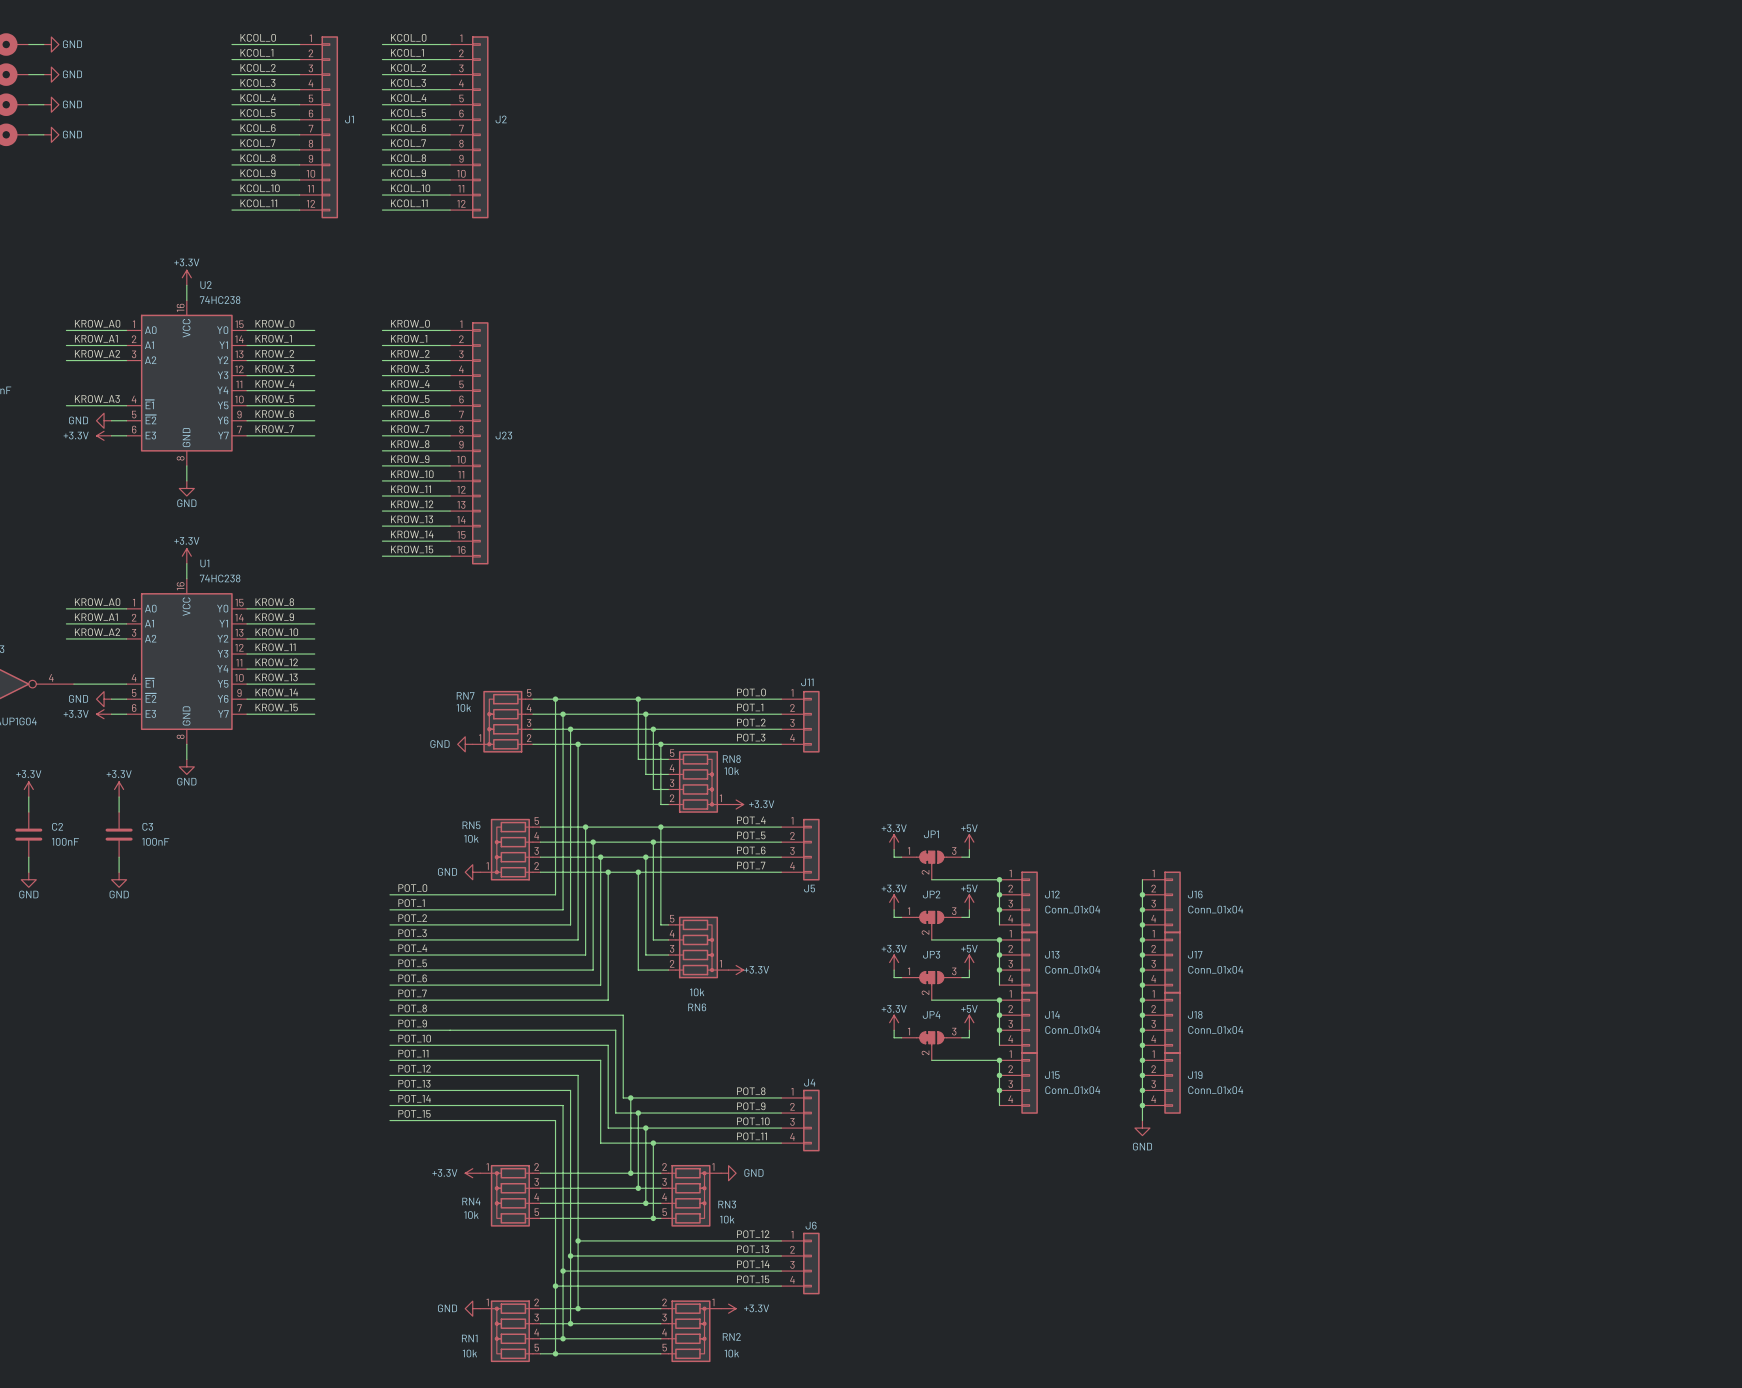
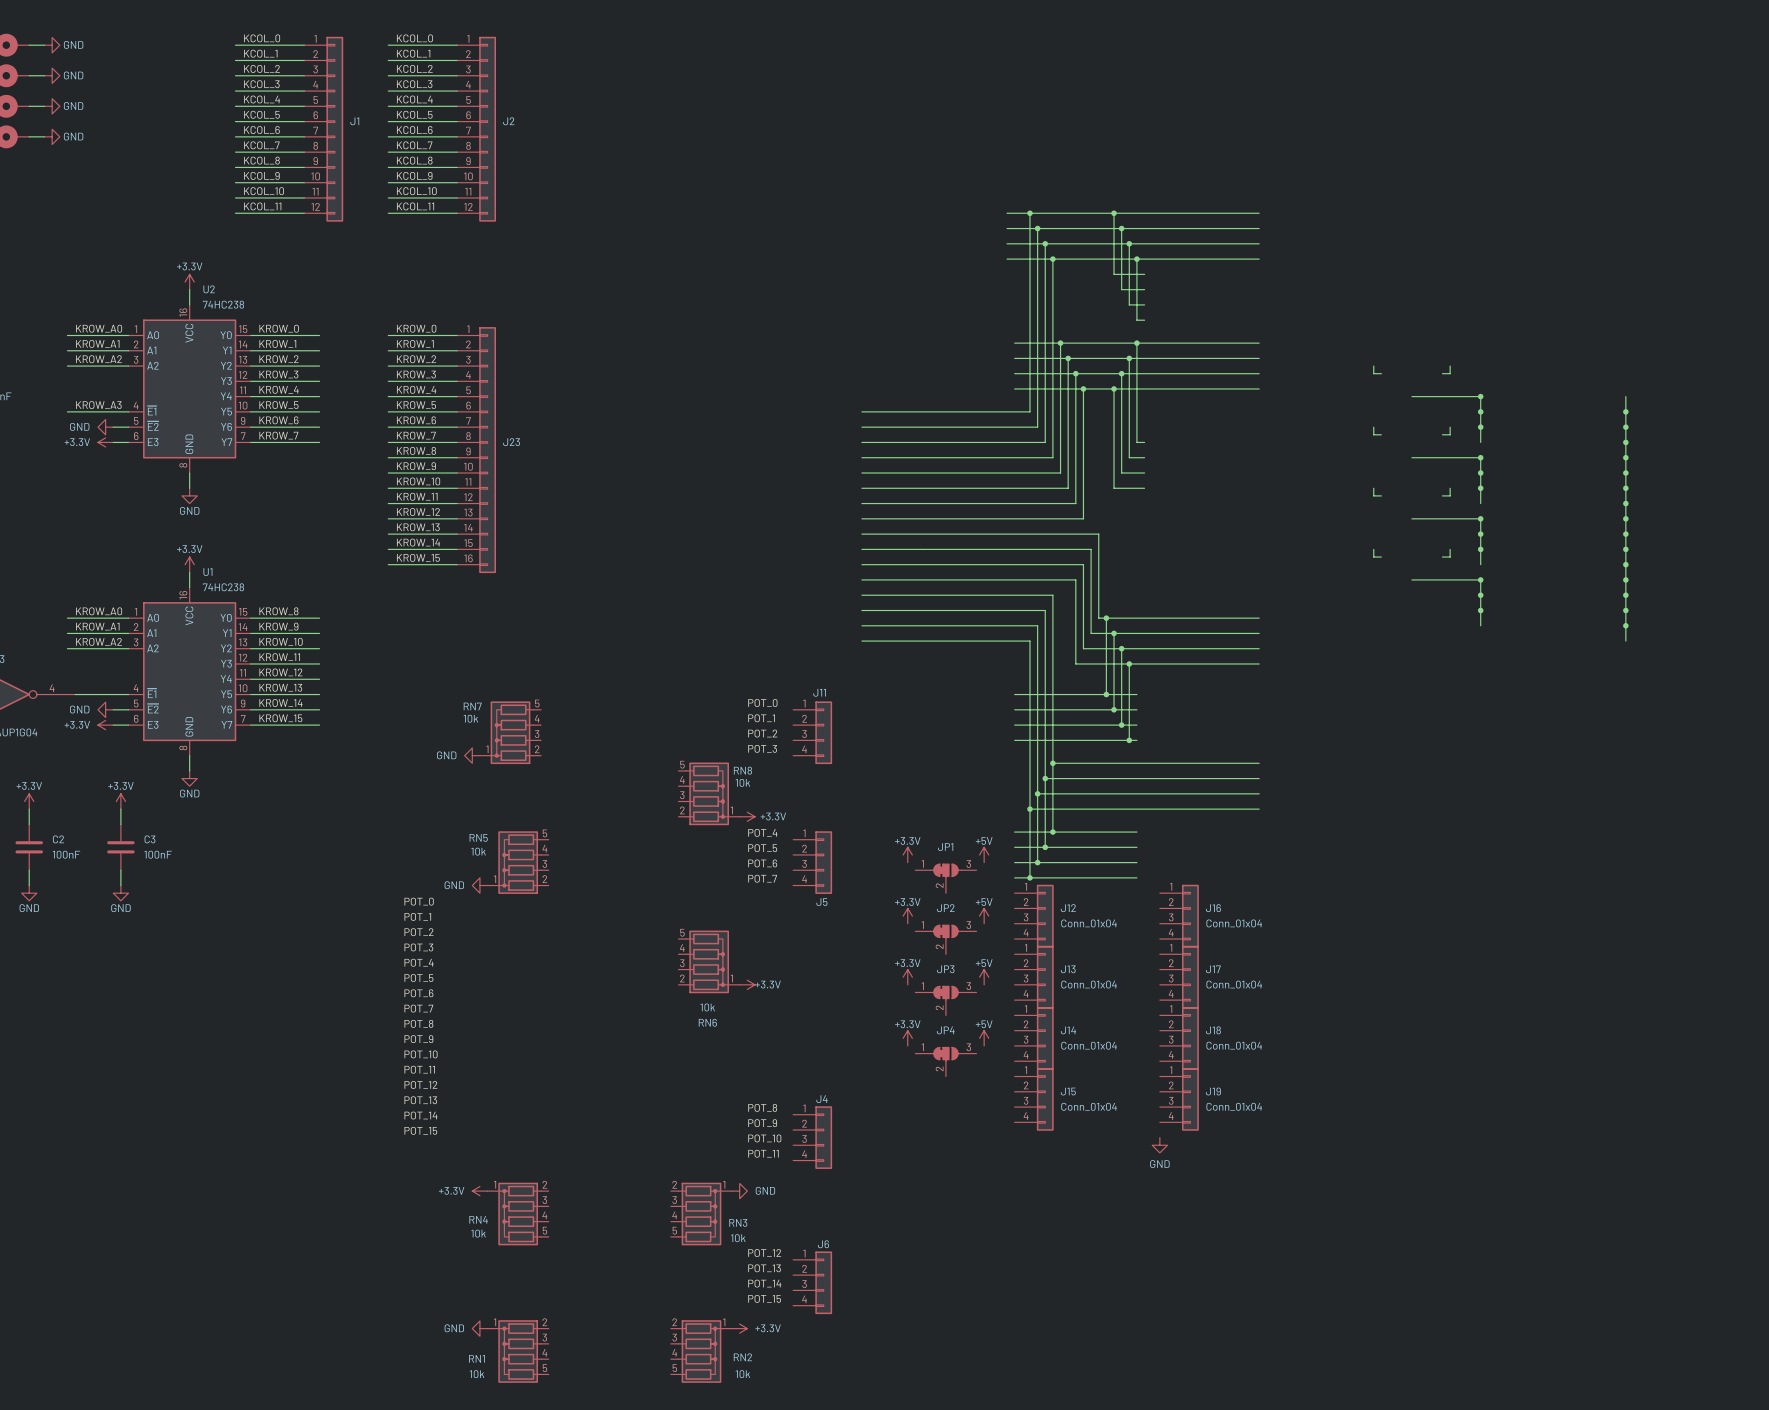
wire: none -> (1007, 213) (1259, 213)
wire: none -> (1029, 213) (1029, 411) (861, 411)
junction: none -> (1029, 213)
wire: none -> (1114, 213) (1114, 274) (1144, 274)
junction: none -> (1114, 213)
wire: none -> (1007, 228) (1259, 228)
wire: none -> (1037, 228) (1037, 427) (861, 427)
junction: none -> (1037, 228)
wire: none -> (1121, 228) (1121, 289) (1144, 289)
junction: none -> (1121, 228)
wire: none -> (1007, 243) (1259, 243)
wire: none -> (1045, 243) (1045, 442) (861, 442)
junction: none -> (1045, 243)
wire: none -> (1129, 243) (1129, 304) (1144, 304)
junction: none -> (1129, 243)
wire: none -> (1007, 259) (1259, 259)
wire: none -> (1052, 259) (1052, 457) (861, 457)
junction: none -> (1052, 259)
wire: none -> (1136, 259) (1136, 320) (1144, 320)
junction: none -> (1136, 259)
wire: none -> (1014, 343) (1259, 343)
wire: none -> (1060, 343) (1060, 473) (861, 473)
junction: none -> (1060, 343)
wire: none -> (1136, 343) (1136, 442) (1144, 442)
junction: none -> (1136, 343)
wire: none -> (1014, 358) (1259, 358)
wire: none -> (1068, 358) (1068, 488) (861, 488)
junction: none -> (1068, 358)
wire: none -> (1129, 358) (1129, 457) (1144, 457)
junction: none -> (1129, 358)
wire: none -> (1373, 366) (1373, 373) (1381, 373)
wire: none -> (1450, 366) (1450, 373) (1442, 373)
wire: none -> (1014, 373) (1259, 373)
wire: none -> (1075, 373) (1075, 503) (861, 503)
junction: none -> (1075, 373)
wire: none -> (1121, 373) (1121, 473) (1144, 473)
junction: none -> (1121, 373)
wire: none -> (1014, 388) (1259, 388)
wire: none -> (1083, 388) (1083, 518) (861, 518)
junction: none -> (1083, 388)
wire: none -> (1114, 388) (1114, 488) (1144, 488)
junction: none -> (1114, 388)
wire: none -> (1411, 396) (1480, 396) (1480, 442)
junction: none -> (1480, 396)
wire: none -> (1625, 396) (1625, 641)
junction: none -> (1480, 411)
junction: none -> (1625, 411)
wire: none -> (1373, 427) (1373, 434) (1381, 434)
wire: none -> (1450, 427) (1450, 434) (1442, 434)
junction: none -> (1480, 427)
junction: none -> (1625, 427)
junction: none -> (1625, 442)
wire: none -> (1411, 457) (1480, 457) (1480, 503)
junction: none -> (1480, 457)
junction: none -> (1625, 457)
junction: none -> (1480, 473)
junction: none -> (1625, 473)
wire: none -> (1373, 488) (1373, 495) (1381, 495)
wire: none -> (1450, 488) (1450, 495) (1442, 495)
junction: none -> (1480, 488)
junction: none -> (1625, 488)
junction: none -> (1625, 503)
wire: none -> (1411, 518) (1480, 518) (1480, 564)
junction: none -> (1480, 518)
junction: none -> (1625, 518)
wire: none -> (861, 534) (1098, 534) (1098, 618) (1259, 618)
junction: none -> (1480, 534)
junction: none -> (1625, 534)
wire: none -> (861, 549) (1091, 549) (1091, 633) (1259, 633)
wire: none -> (1373, 549) (1373, 557) (1381, 557)
wire: none -> (1450, 549) (1450, 557) (1442, 557)
junction: none -> (1480, 549)
junction: none -> (1625, 549)
wire: none -> (861, 564) (1083, 564) (1083, 648) (1259, 648)
junction: none -> (1625, 564)
wire: none -> (861, 579) (1075, 579) (1075, 663) (1259, 663)
wire: none -> (1411, 579) (1480, 579) (1480, 625)
junction: none -> (1480, 579)
junction: none -> (1625, 579)
wire: none -> (861, 595) (1052, 595) (1052, 832)
junction: none -> (1480, 595)
junction: none -> (1625, 595)
wire: none -> (861, 610) (1045, 610) (1045, 847)
junction: none -> (1480, 610)
junction: none -> (1625, 610)
wire: none -> (1106, 618) (1106, 694)
junction: none -> (1106, 618)
wire: none -> (861, 625) (1037, 625) (1037, 862)
junction: none -> (1625, 625)
wire: none -> (1114, 633) (1114, 709)
junction: none -> (1114, 633)
wire: none -> (861, 641) (1029, 641) (1029, 877)
wire: none -> (1121, 648) (1121, 725)
junction: none -> (1121, 648)
wire: none -> (1129, 663) (1129, 740)
junction: none -> (1129, 663)
wire: none -> (1014, 694) (1136, 694)
junction: none -> (1106, 694)
wire: (532, 699) (781, 699) -> none
wire: (555, 699) (555, 894) (389, 894) -> none
junction: (555, 699) -> none
wire: (638, 699) (638, 759) (668, 759) -> none
junction: (638, 699) -> none
wire: none -> (1014, 709) (1136, 709)
junction: none -> (1114, 709)
wire: (532, 714) (781, 714) -> none
wire: (563, 714) (563, 909) (389, 909) -> none
junction: (563, 714) -> none
wire: (645, 714) (645, 774) (668, 774) -> none
junction: (645, 714) -> none
wire: none -> (1014, 725) (1136, 725)
junction: none -> (1121, 725)
wire: (532, 729) (781, 729) -> none
wire: (570, 729) (570, 924) (389, 924) -> none
junction: (570, 729) -> none
wire: (653, 729) (653, 789) (668, 789) -> none
junction: (653, 729) -> none
wire: none -> (1014, 740) (1136, 740)
junction: none -> (1129, 740)
wire: (532, 744) (781, 744) -> none
wire: (578, 744) (578, 939) (389, 939) -> none
junction: (578, 744) -> none
wire: (660, 744) (660, 804) (668, 804) -> none
junction: (660, 744) -> none
wire: none -> (1052, 763) (1259, 763)
junction: none -> (1052, 763)
wire: none -> (1045, 778) (1259, 778)
junction: none -> (1045, 778)
wire: none -> (1037, 793) (1259, 793)
junction: none -> (1037, 793)
wire: none -> (1029, 809) (1259, 809)
junction: none -> (1029, 809)
wire: none -> (1014, 832) (1136, 832)
junction: none -> (1052, 832)
wire: (540, 827) (781, 827) -> none
wire: (585, 827) (585, 955) (389, 955) -> none
junction: (585, 827) -> none
wire: (660, 827) (660, 924) (668, 924) -> none
junction: (660, 827) -> none
wire: none -> (1014, 847) (1136, 847)
junction: none -> (1045, 847)
wire: (540, 842) (781, 842) -> none
wire: (593, 842) (593, 970) (389, 970) -> none
junction: (593, 842) -> none
wire: (653, 842) (653, 939) (668, 939) -> none
junction: (653, 842) -> none
wire: (894, 849) (894, 857) (901, 857) -> none
wire: (969, 849) (969, 857) (961, 857) -> none
wire: none -> (1014, 862) (1136, 862)
junction: none -> (1037, 862)
wire: (540, 857) (781, 857) -> none
wire: (600, 857) (600, 985) (389, 985) -> none
junction: (600, 857) -> none
wire: (645, 857) (645, 955) (668, 955) -> none
junction: (645, 857) -> none
wire: none -> (1014, 877) (1136, 877)
junction: none -> (1029, 877)
wire: (540, 872) (781, 872) -> none
wire: (608, 872) (608, 1000) (389, 1000) -> none
junction: (608, 872) -> none
wire: (638, 872) (638, 970) (668, 970) -> none
junction: (638, 872) -> none
wire: (931, 879) (999, 879) (999, 924) -> none
junction: (999, 879) -> none
wire: (1142, 879) (1142, 1120) -> none
junction: (999, 894) -> none
junction: (1142, 894) -> none
wire: (894, 909) (894, 917) (901, 917) -> none
wire: (969, 909) (969, 917) (961, 917) -> none
junction: (999, 909) -> none
junction: (1142, 909) -> none
junction: (1142, 924) -> none
wire: (931, 939) (999, 939) (999, 985) -> none
junction: (999, 939) -> none
junction: (1142, 939) -> none
junction: (999, 955) -> none
junction: (1142, 955) -> none
wire: (894, 970) (894, 977) (901, 977) -> none
wire: (969, 970) (969, 977) (961, 977) -> none
junction: (999, 970) -> none
junction: (1142, 970) -> none
junction: (1142, 985) -> none
wire: (931, 1000) (999, 1000) (999, 1045) -> none
junction: (999, 1000) -> none
junction: (1142, 1000) -> none
wire: (389, 1015) (623, 1015) (623, 1097) (781, 1097) -> none
junction: (999, 1015) -> none
junction: (1142, 1015) -> none
wire: (389, 1030) (615, 1030) (615, 1113) (781, 1113) -> none
wire: (894, 1030) (894, 1037) (901, 1037) -> none
wire: (969, 1030) (969, 1037) (961, 1037) -> none
junction: (999, 1030) -> none
junction: (1142, 1030) -> none
wire: (389, 1045) (608, 1045) (608, 1128) (781, 1128) -> none
junction: (1142, 1045) -> none
wire: (389, 1060) (600, 1060) (600, 1143) (781, 1143) -> none
wire: (931, 1060) (999, 1060) (999, 1105) -> none
junction: (999, 1060) -> none
junction: (1142, 1060) -> none
wire: (389, 1075) (578, 1075) (578, 1308) -> none
junction: (999, 1075) -> none
junction: (1142, 1075) -> none
wire: (389, 1090) (570, 1090) (570, 1323) -> none
junction: (999, 1090) -> none
junction: (1142, 1090) -> none
wire: (630, 1097) (630, 1173) -> none
junction: (630, 1097) -> none
wire: (389, 1105) (563, 1105) (563, 1338) -> none
junction: (1142, 1105) -> none
wire: (638, 1113) (638, 1188) -> none
junction: (638, 1113) -> none
wire: (389, 1120) (555, 1120) (555, 1353) -> none
wire: (645, 1128) (645, 1203) -> none
junction: (645, 1128) -> none
wire: (653, 1143) (653, 1218) -> none
junction: (653, 1143) -> none
wire: (540, 1173) (660, 1173) -> none
junction: (630, 1173) -> none
wire: (540, 1188) (660, 1188) -> none
junction: (638, 1188) -> none
wire: (540, 1203) (660, 1203) -> none
junction: (645, 1203) -> none
wire: (540, 1218) (660, 1218) -> none
junction: (653, 1218) -> none
wire: (578, 1240) (781, 1240) -> none
junction: (578, 1240) -> none
wire: (570, 1255) (781, 1255) -> none
junction: (570, 1255) -> none
wire: (563, 1271) (781, 1271) -> none
junction: (563, 1271) -> none
wire: (555, 1286) (781, 1286) -> none
junction: (555, 1286) -> none
wire: (540, 1308) (660, 1308) -> none
junction: (578, 1308) -> none
wire: (540, 1323) (660, 1323) -> none
junction: (570, 1323) -> none
wire: (540, 1338) (660, 1338) -> none
junction: (563, 1338) -> none
wire: (540, 1353) (660, 1353) -> none
junction: (555, 1353) -> none

